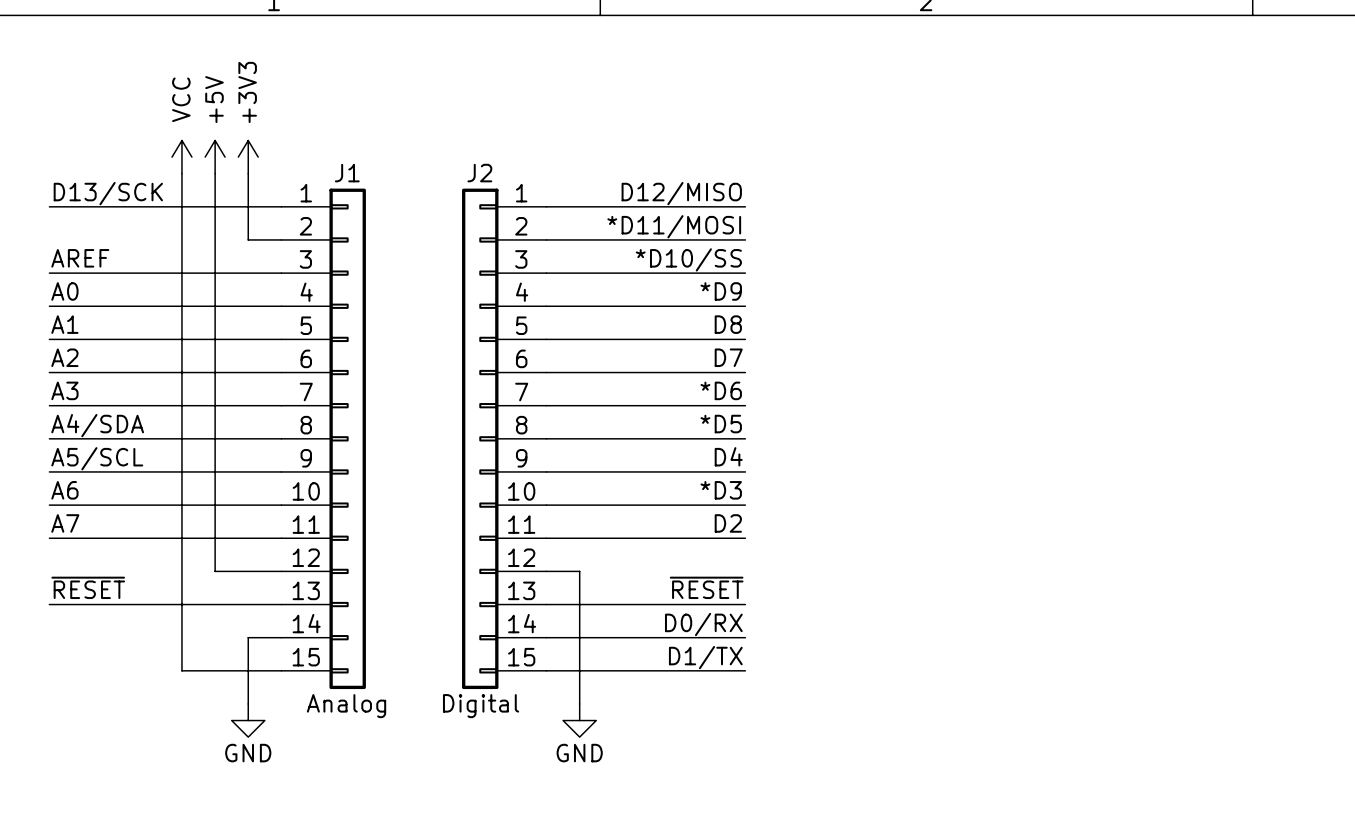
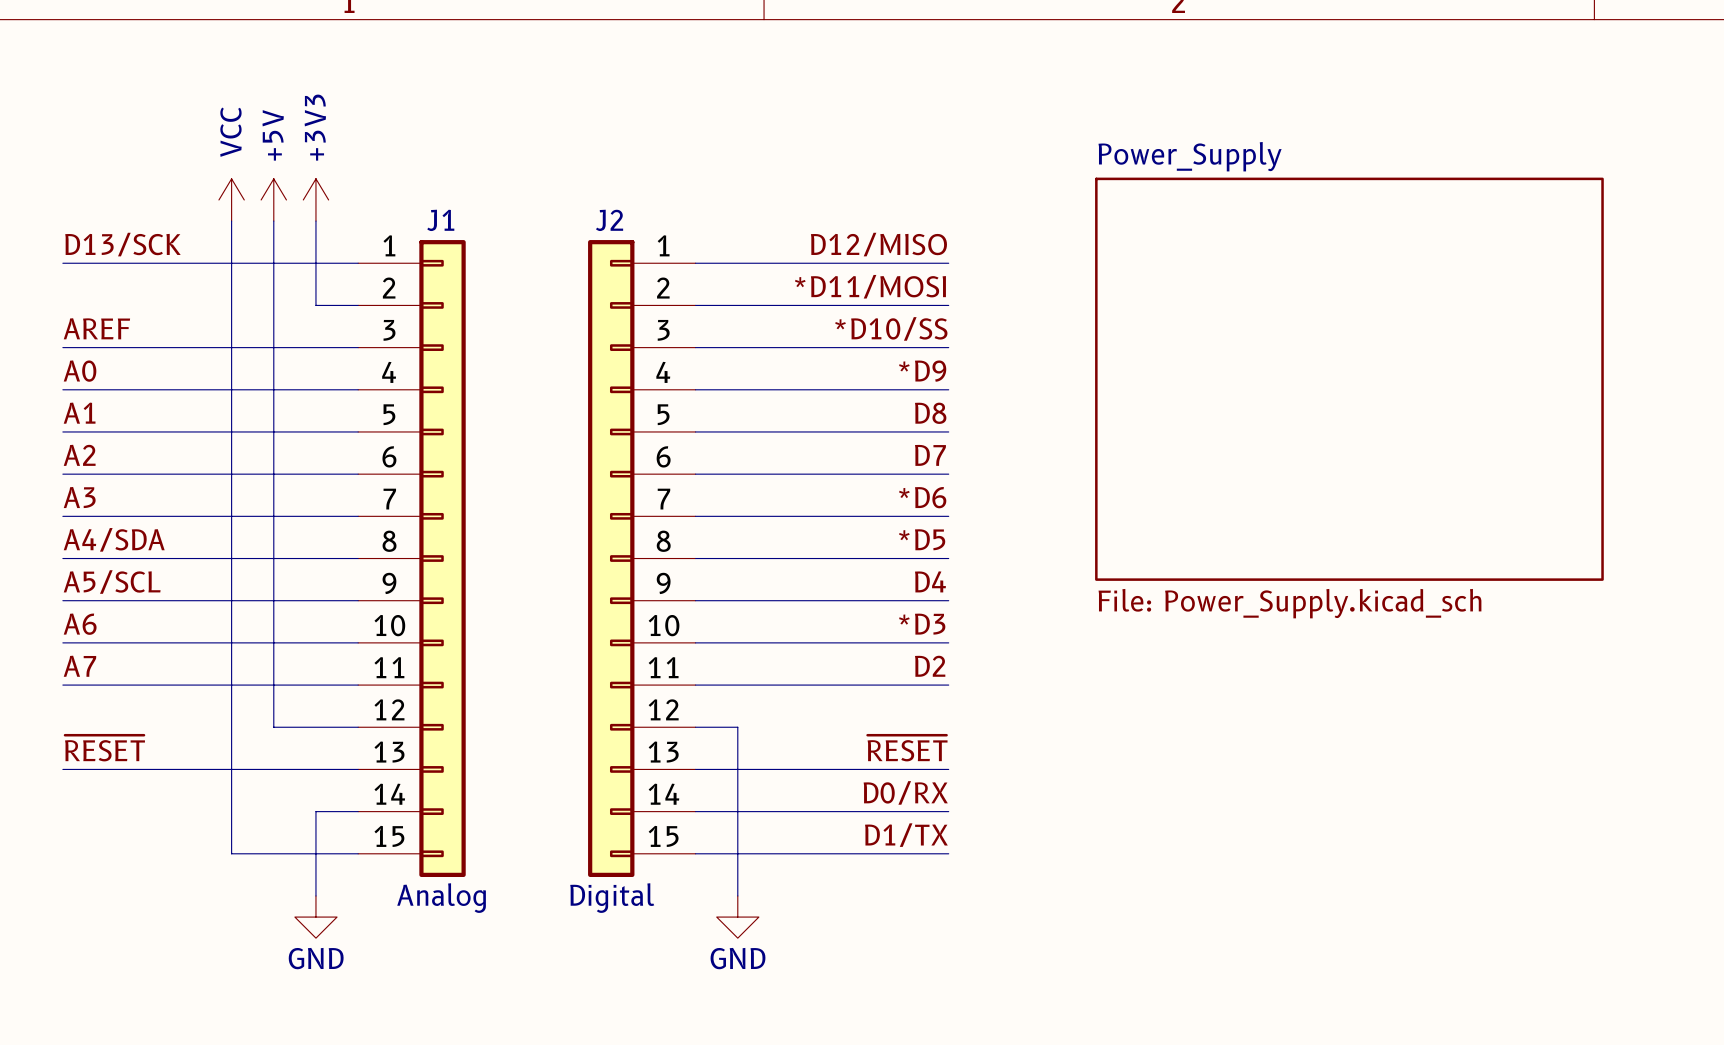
sheet Power_Supply: none -> File: Power_Supply.kicad_sch (1349, 379)

